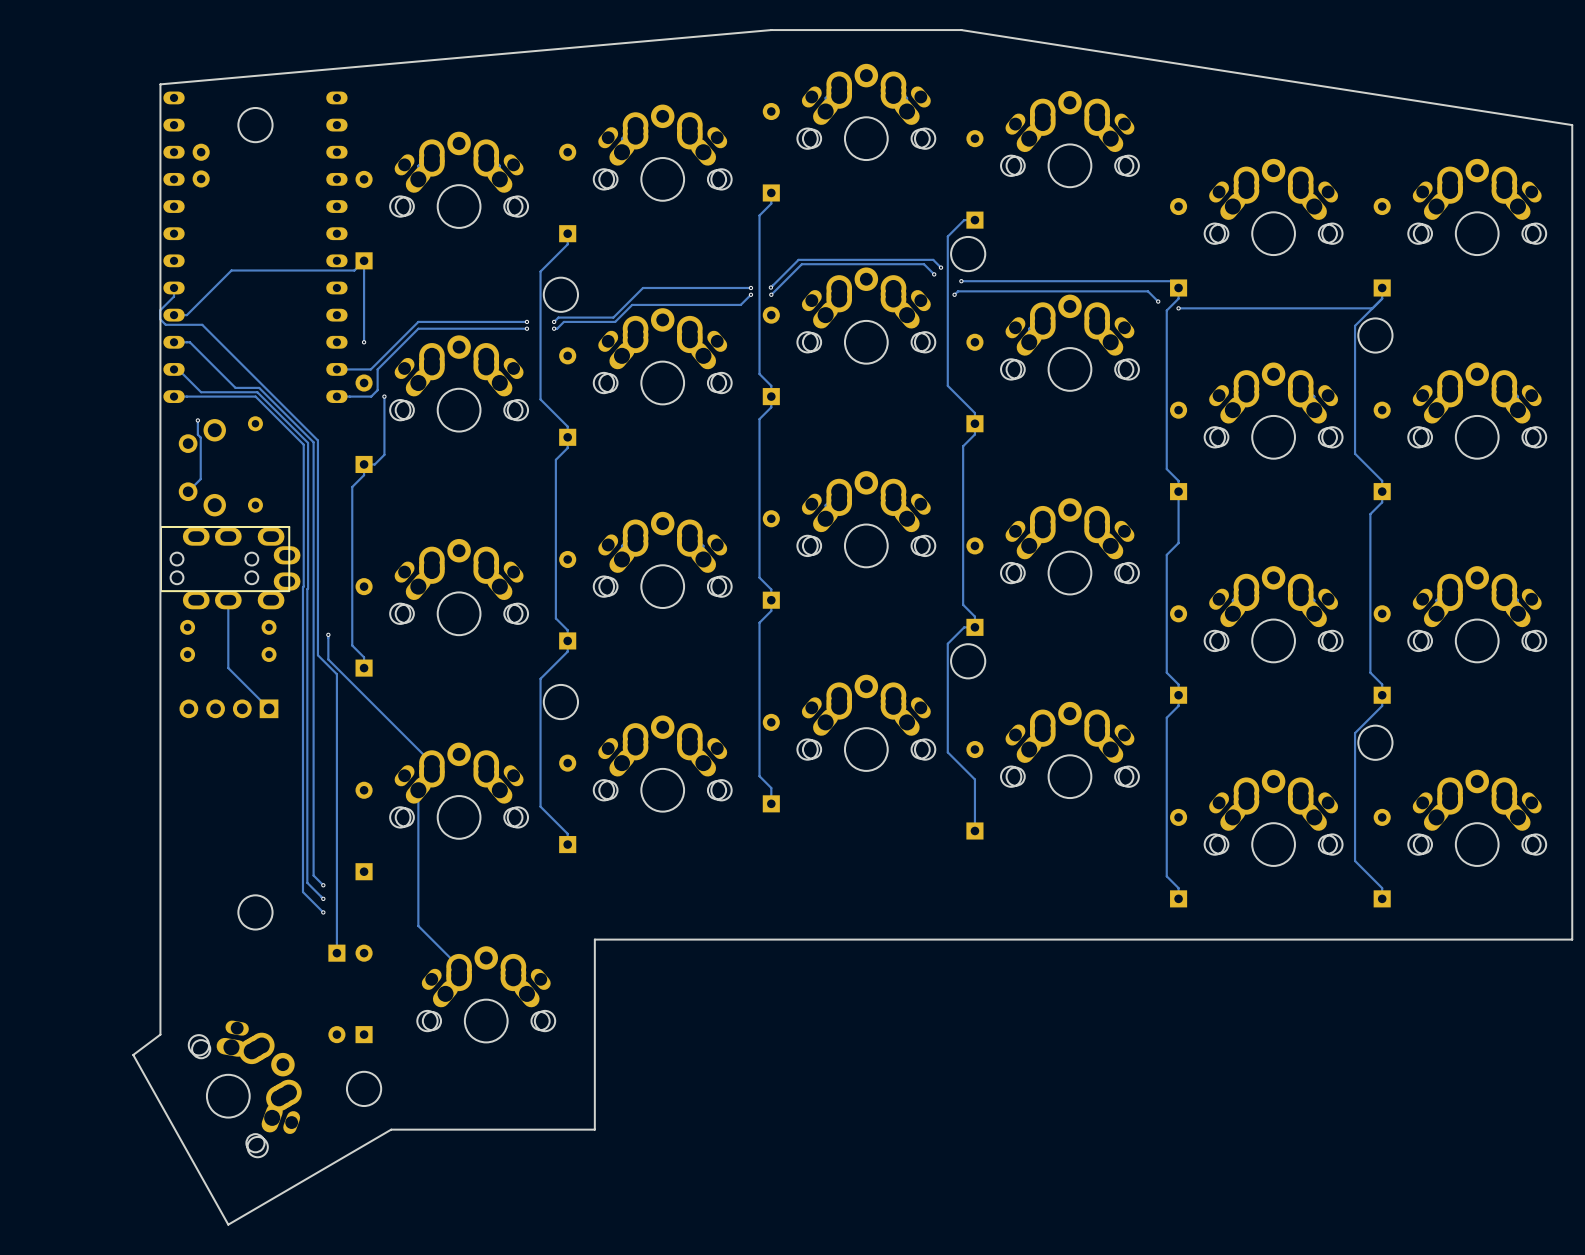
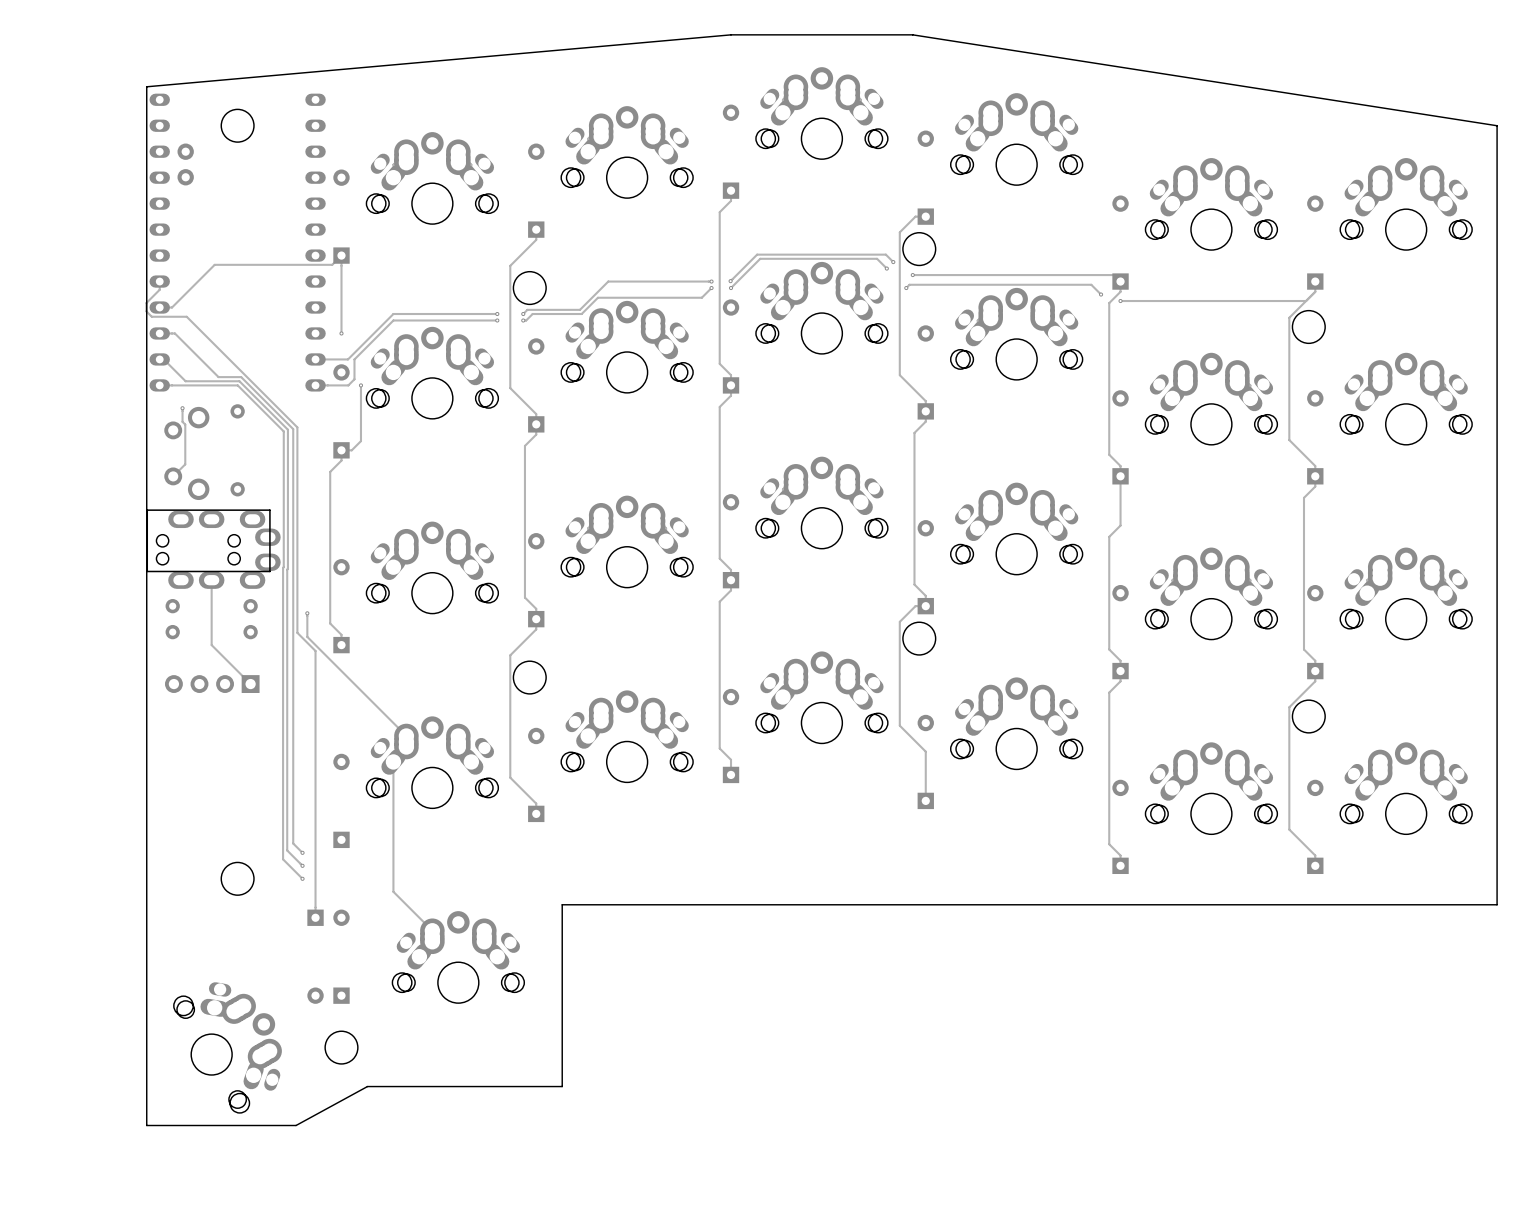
board edge: (160, 1034) (133, 1054) (228, 1224) (391, 1129) -> (146, 995) (146, 1125) (296, 1125) (367, 1086)

